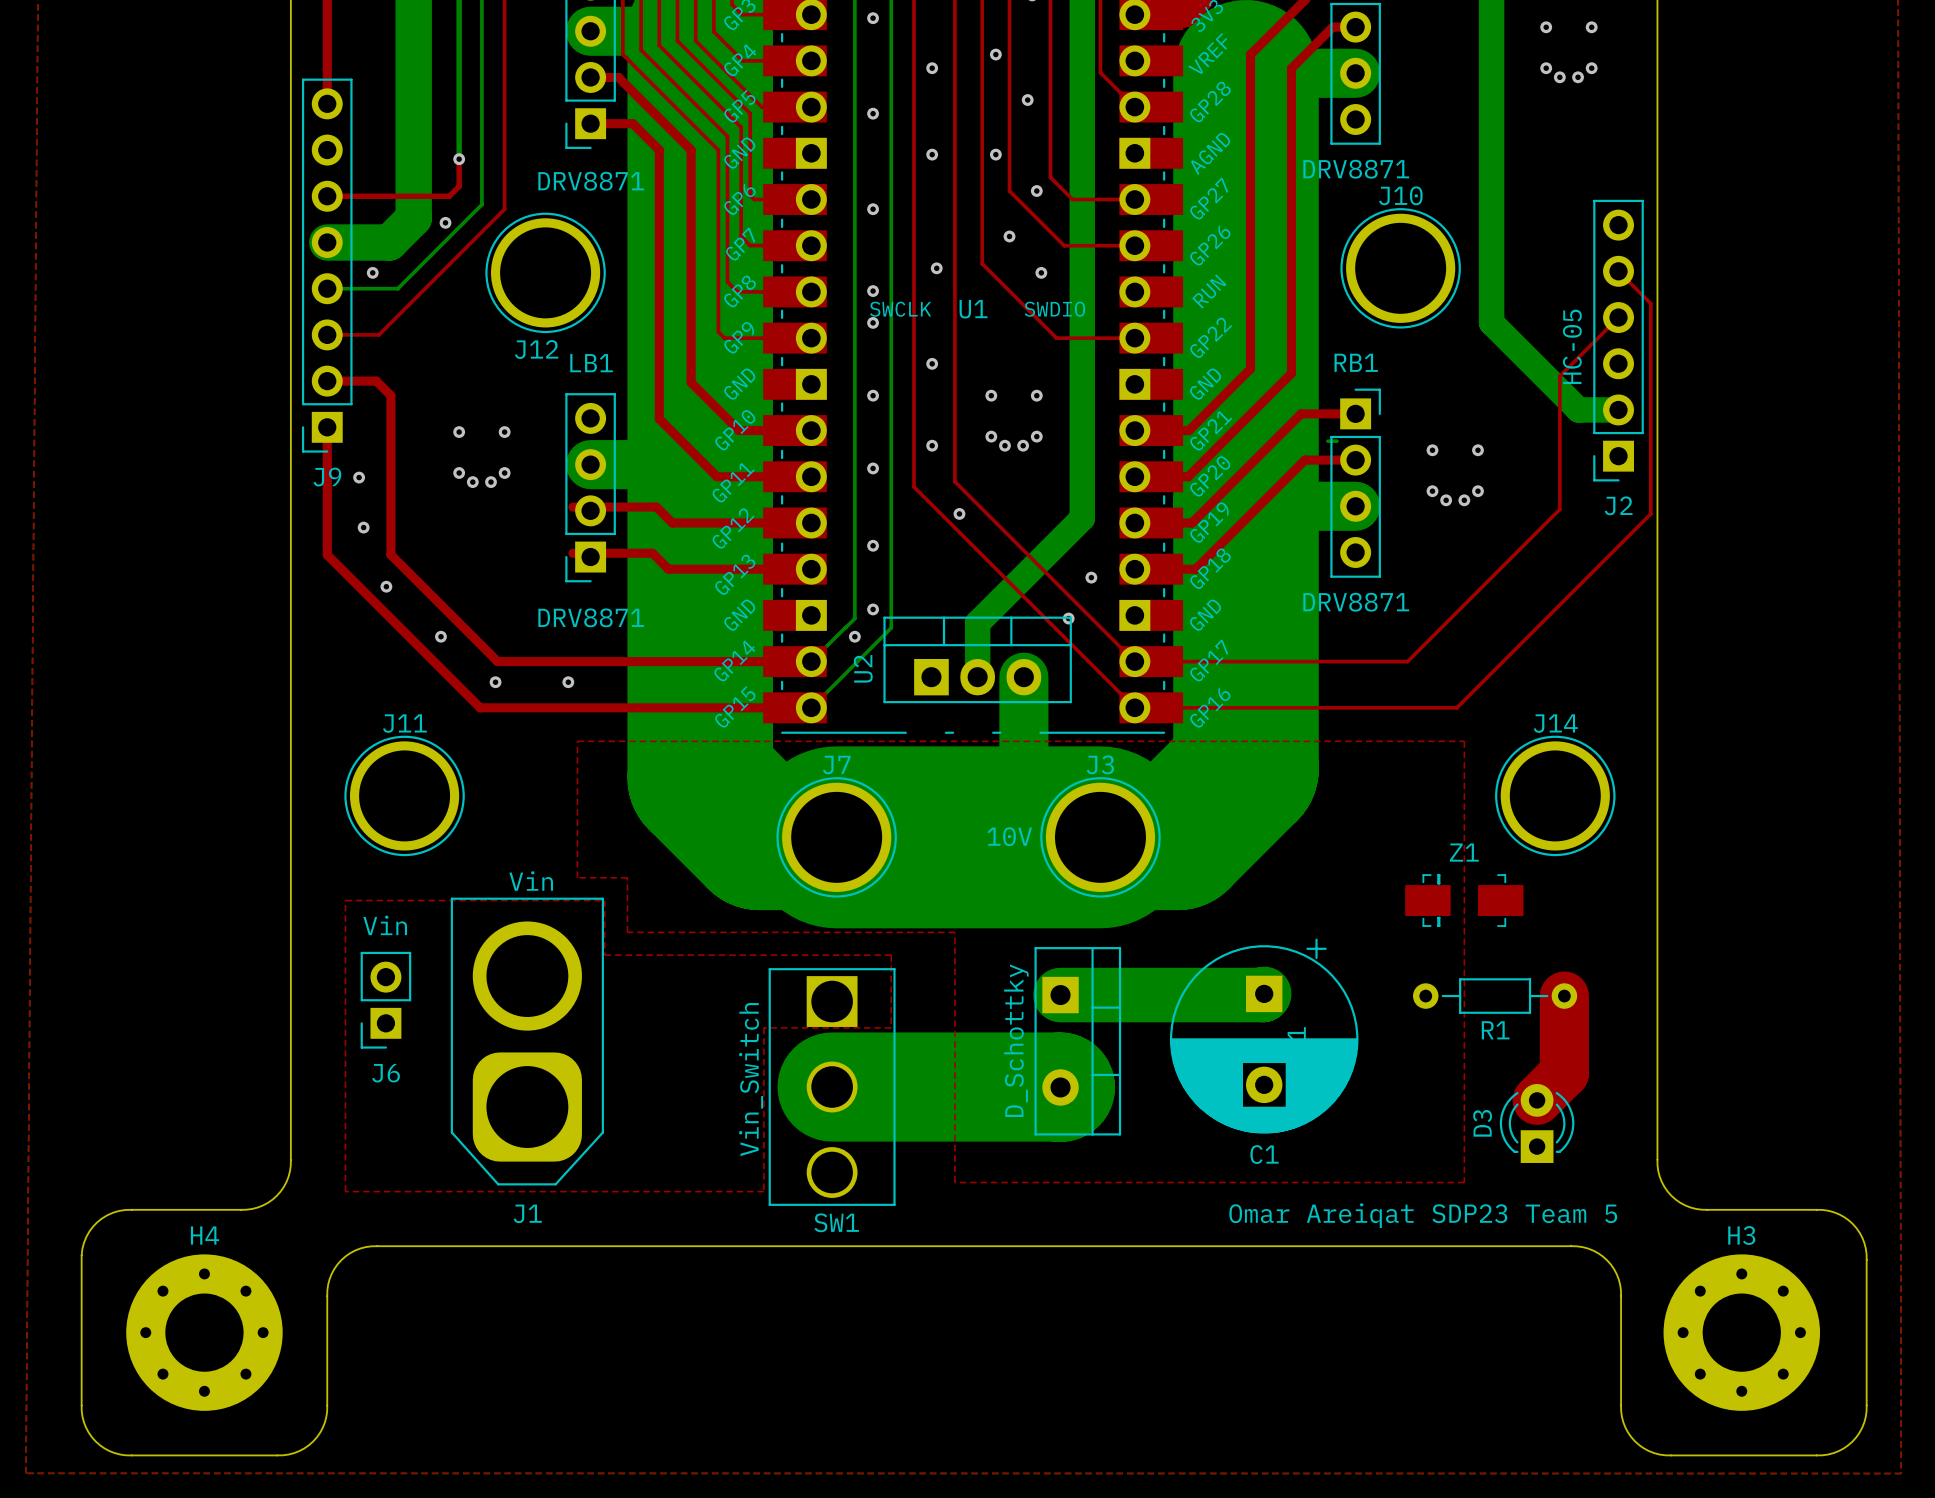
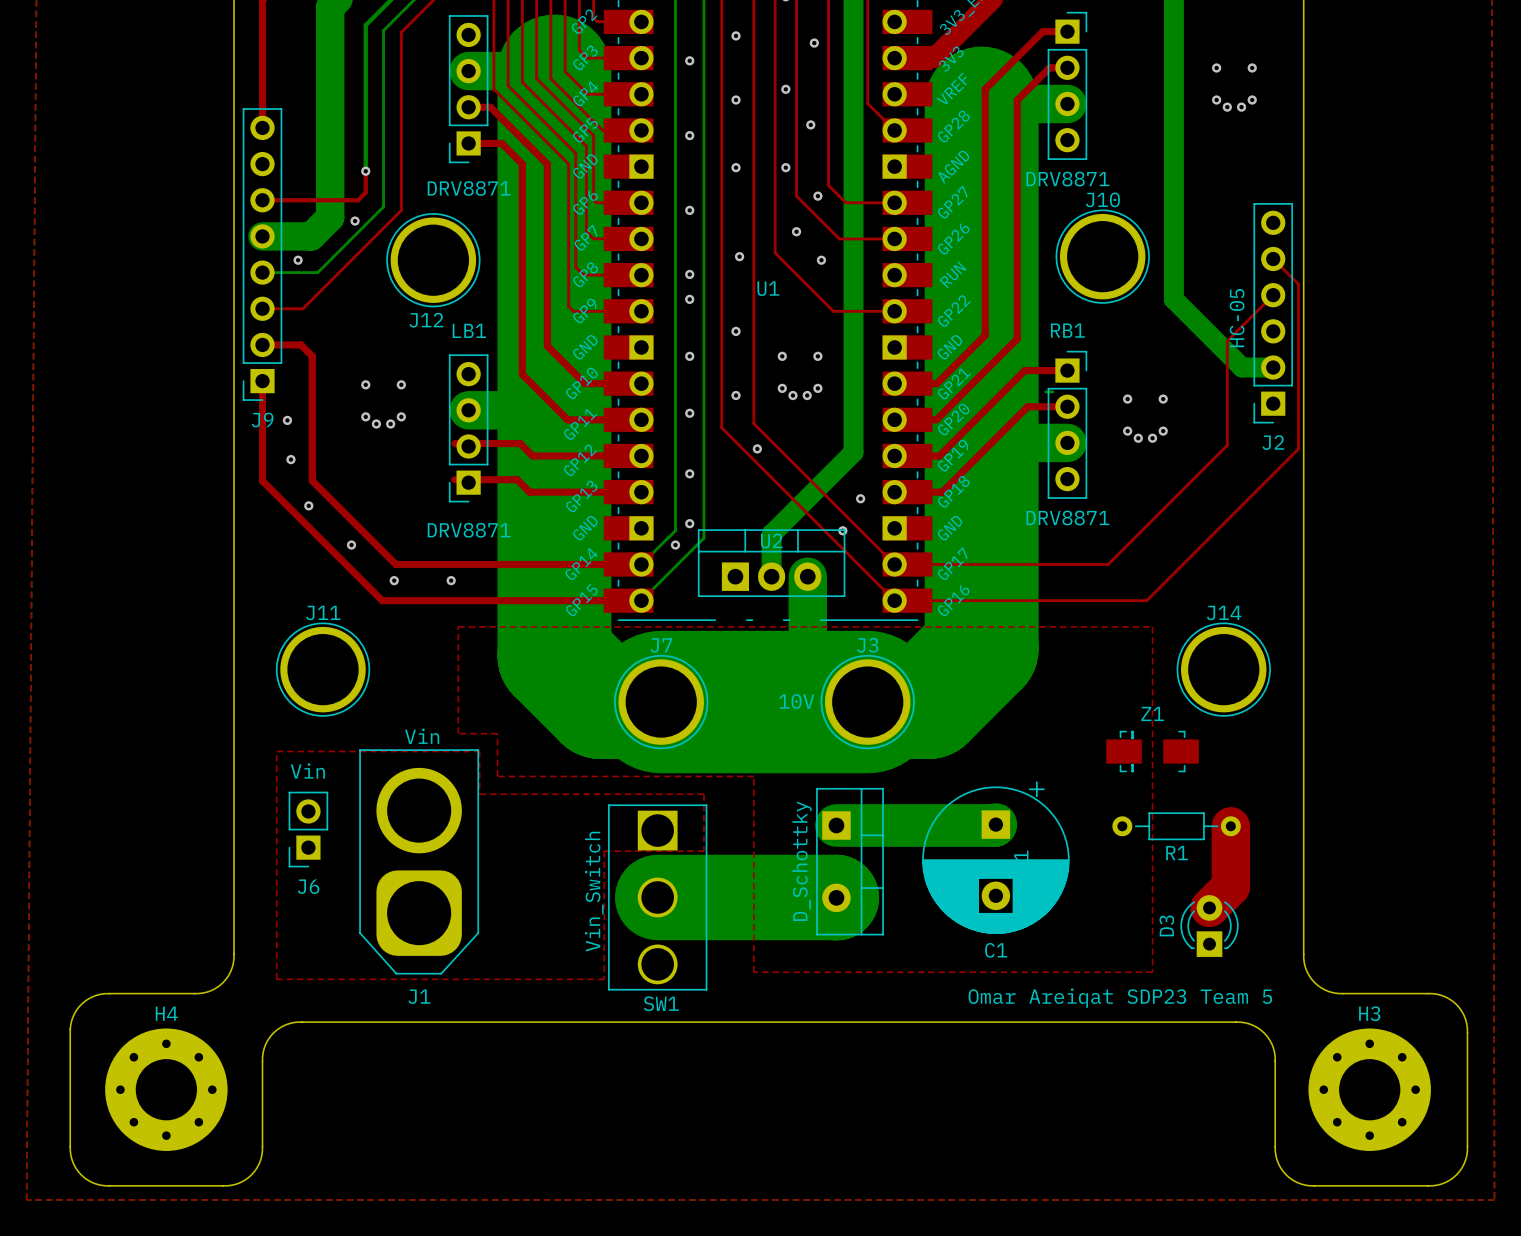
U1 text: SWCLK (900, 309) -> none
U1 text: SWDIO (1054, 309) -> none
U2 name rotation: 0° (863, 668) -> 90° clockwise (771, 540)
U2 name position: U2 (863, 668) -> U2 (771, 540)

